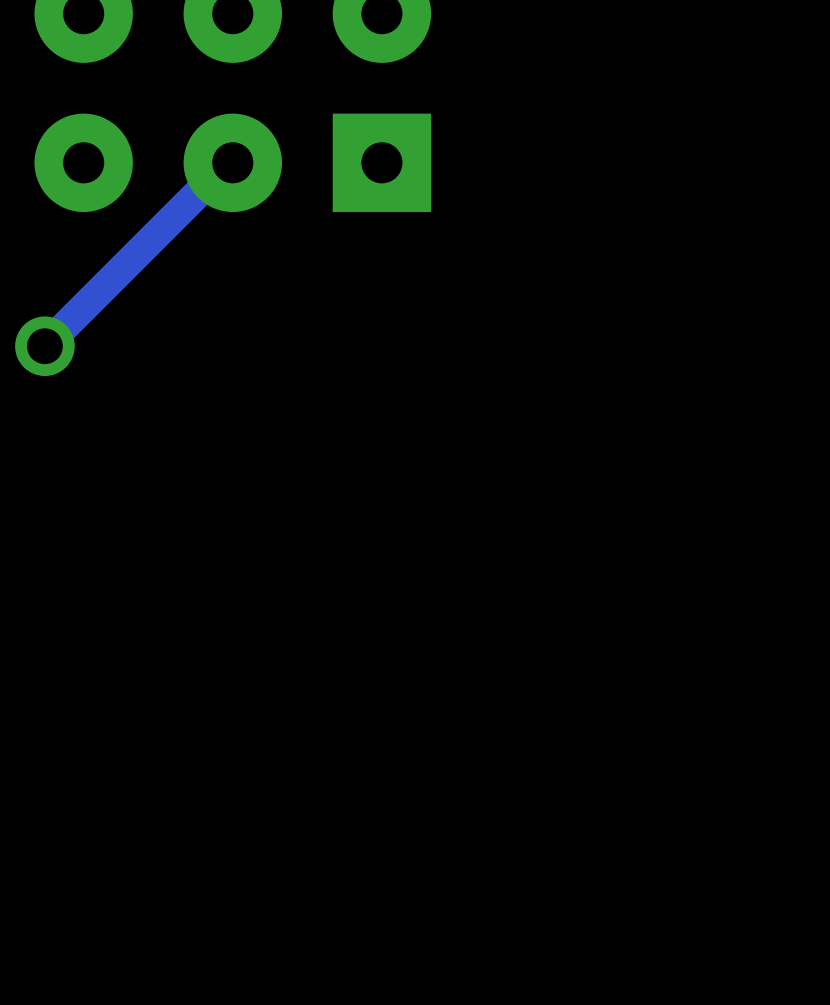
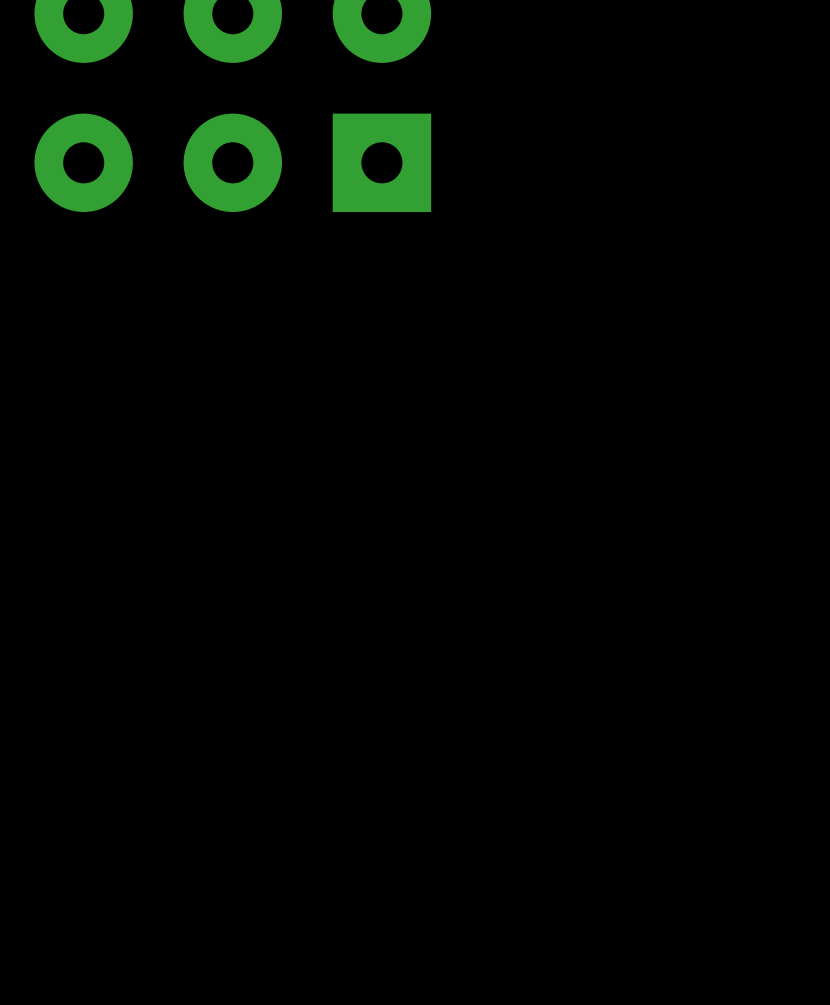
track: (232, 162) (224, 166) (44, 346) -> none
via: (44, 346) -> none

